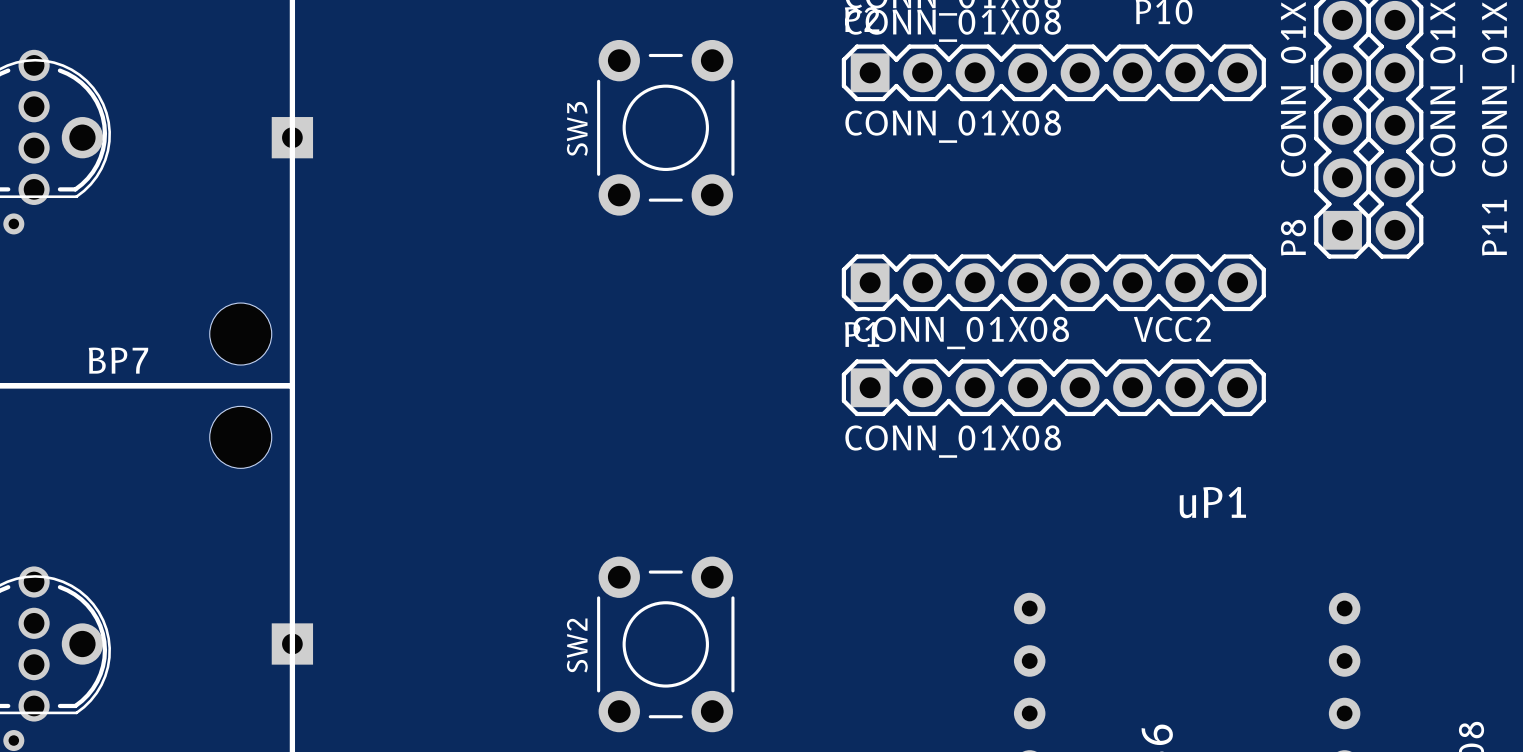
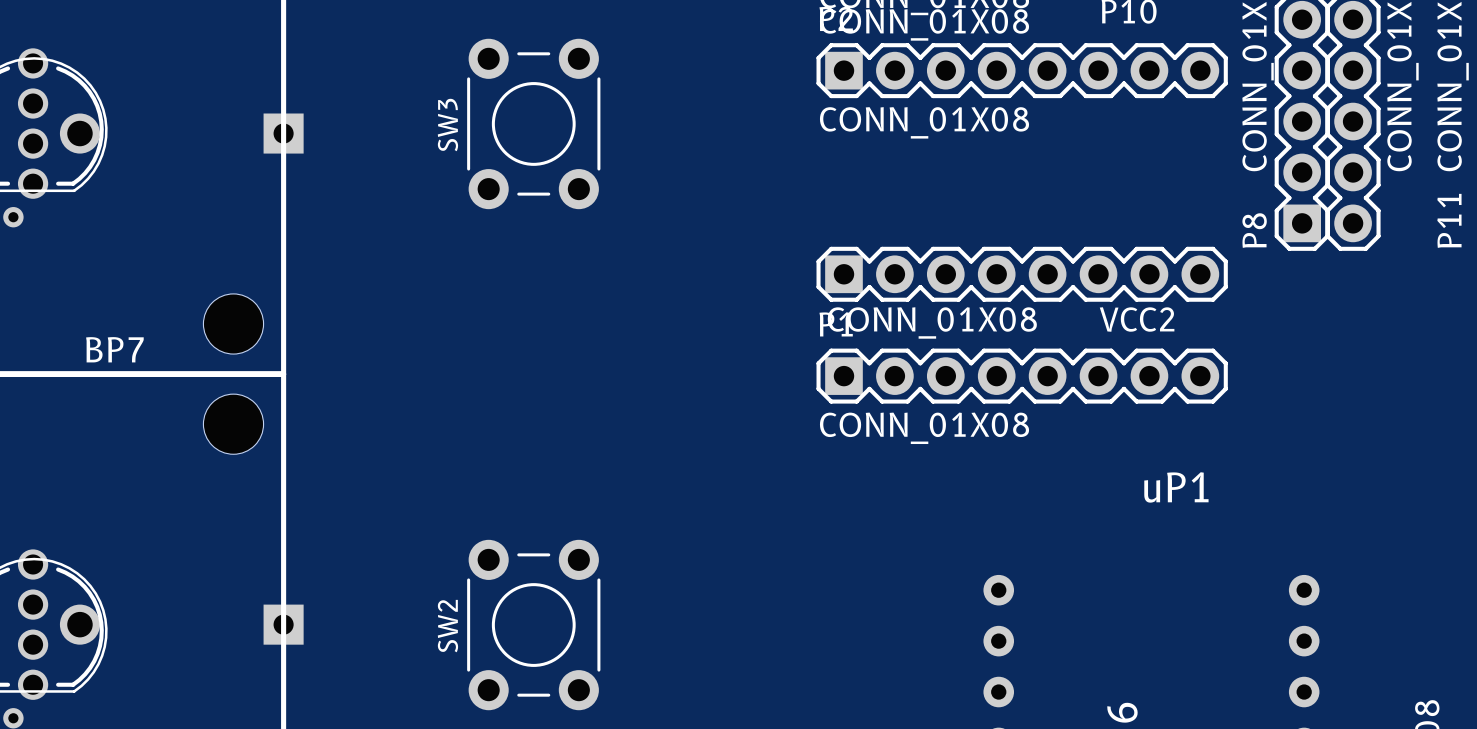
SW3 position: (665, 127) -> (533, 123)
SW2 position: (665, 644) -> (533, 625)

